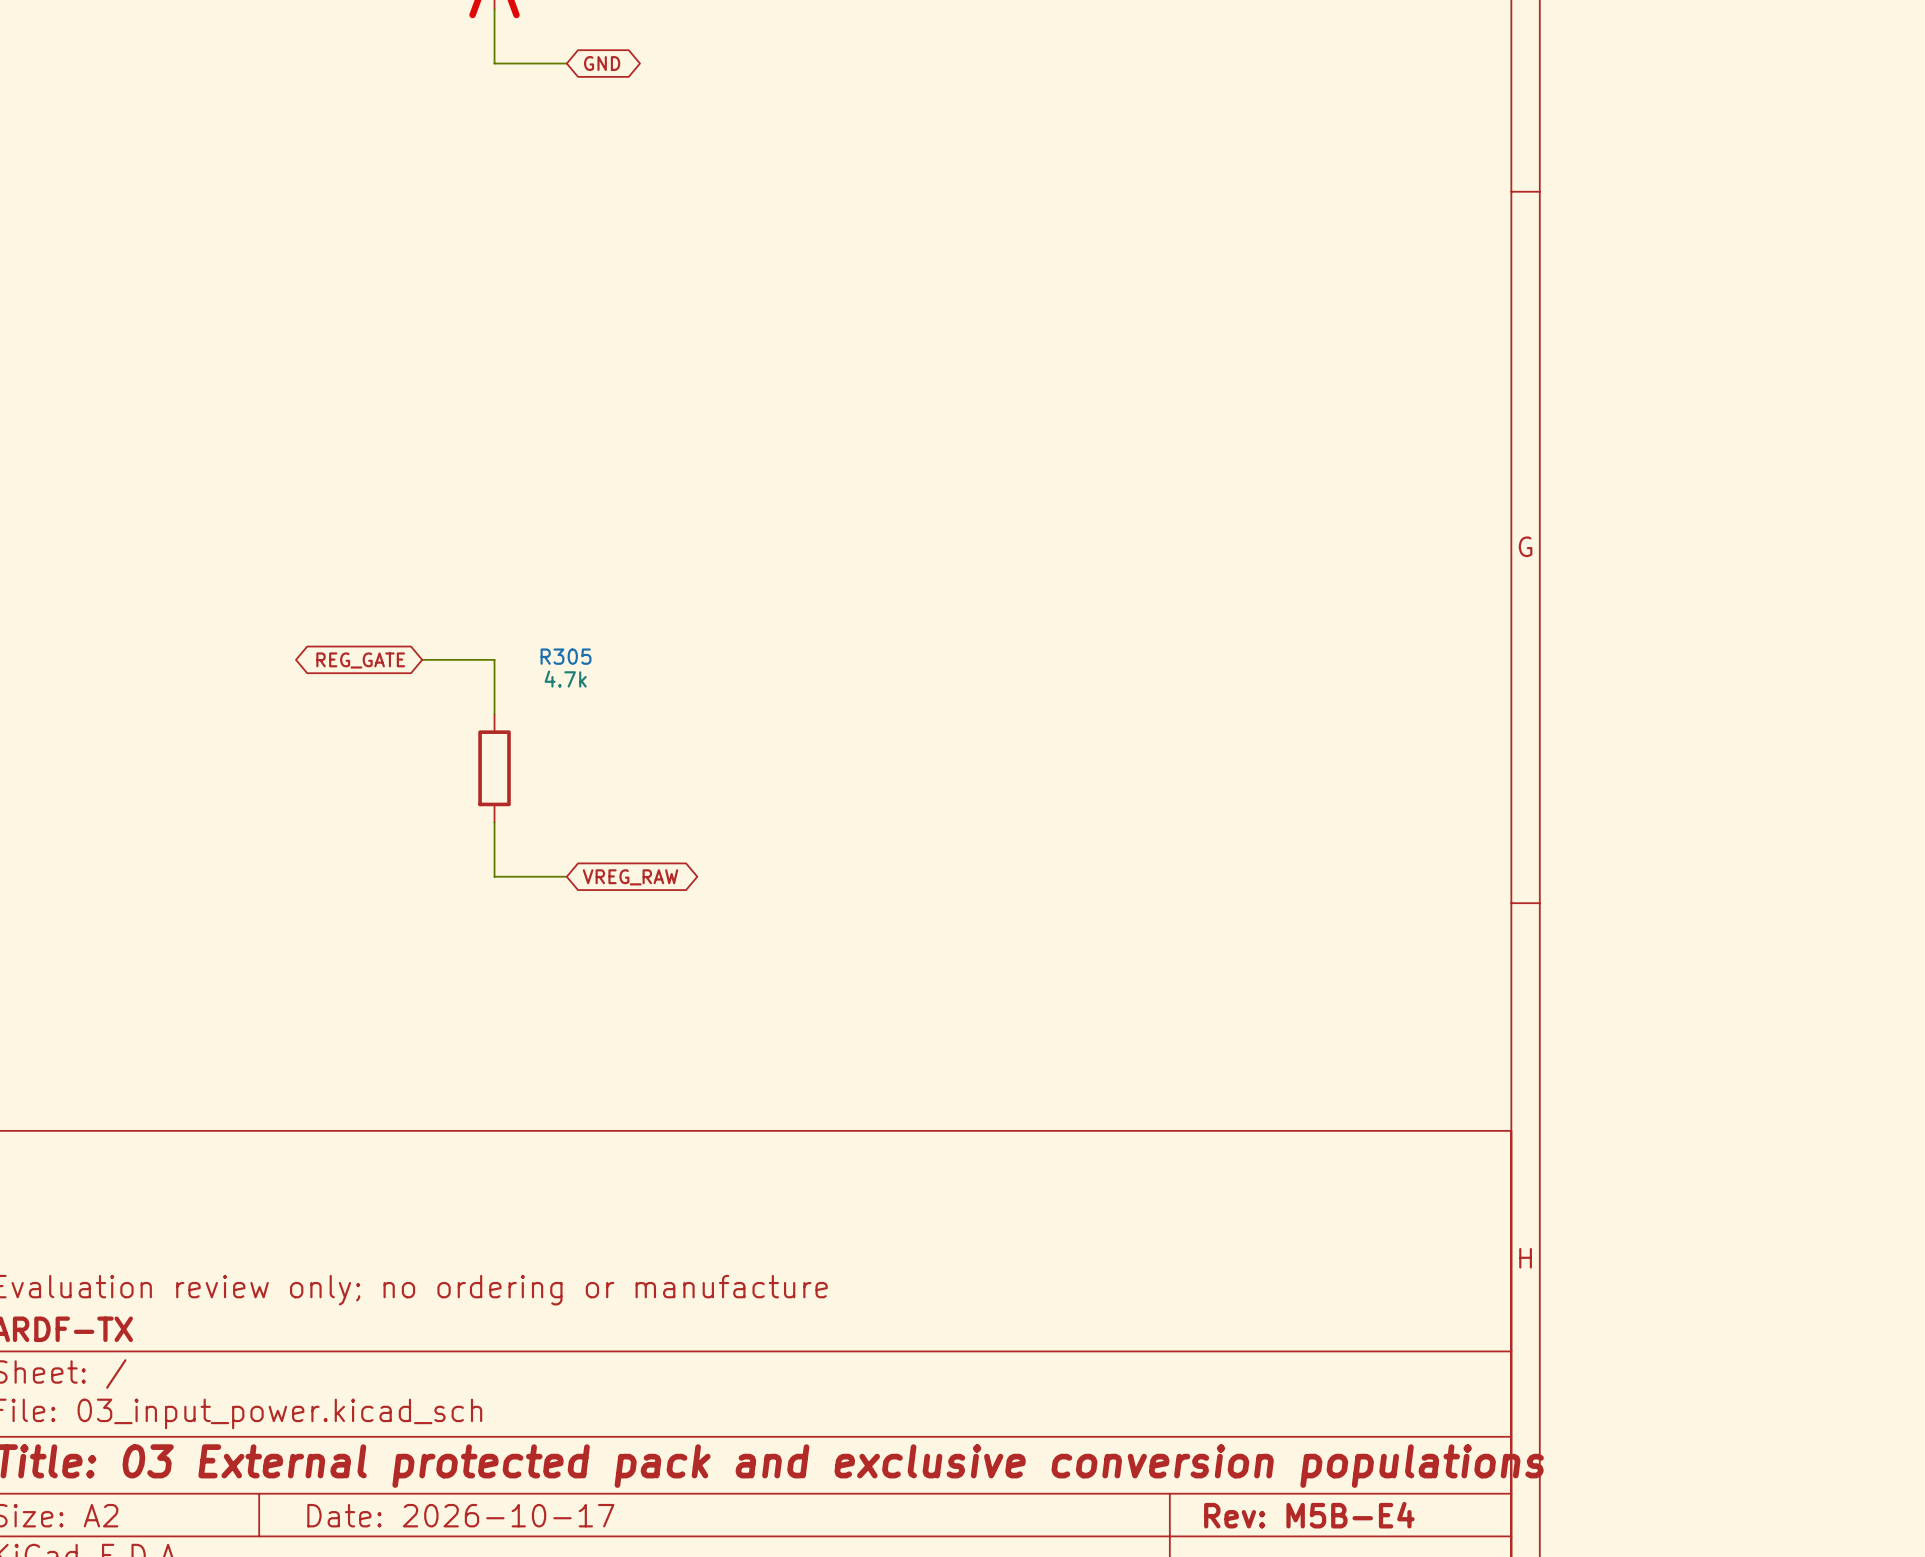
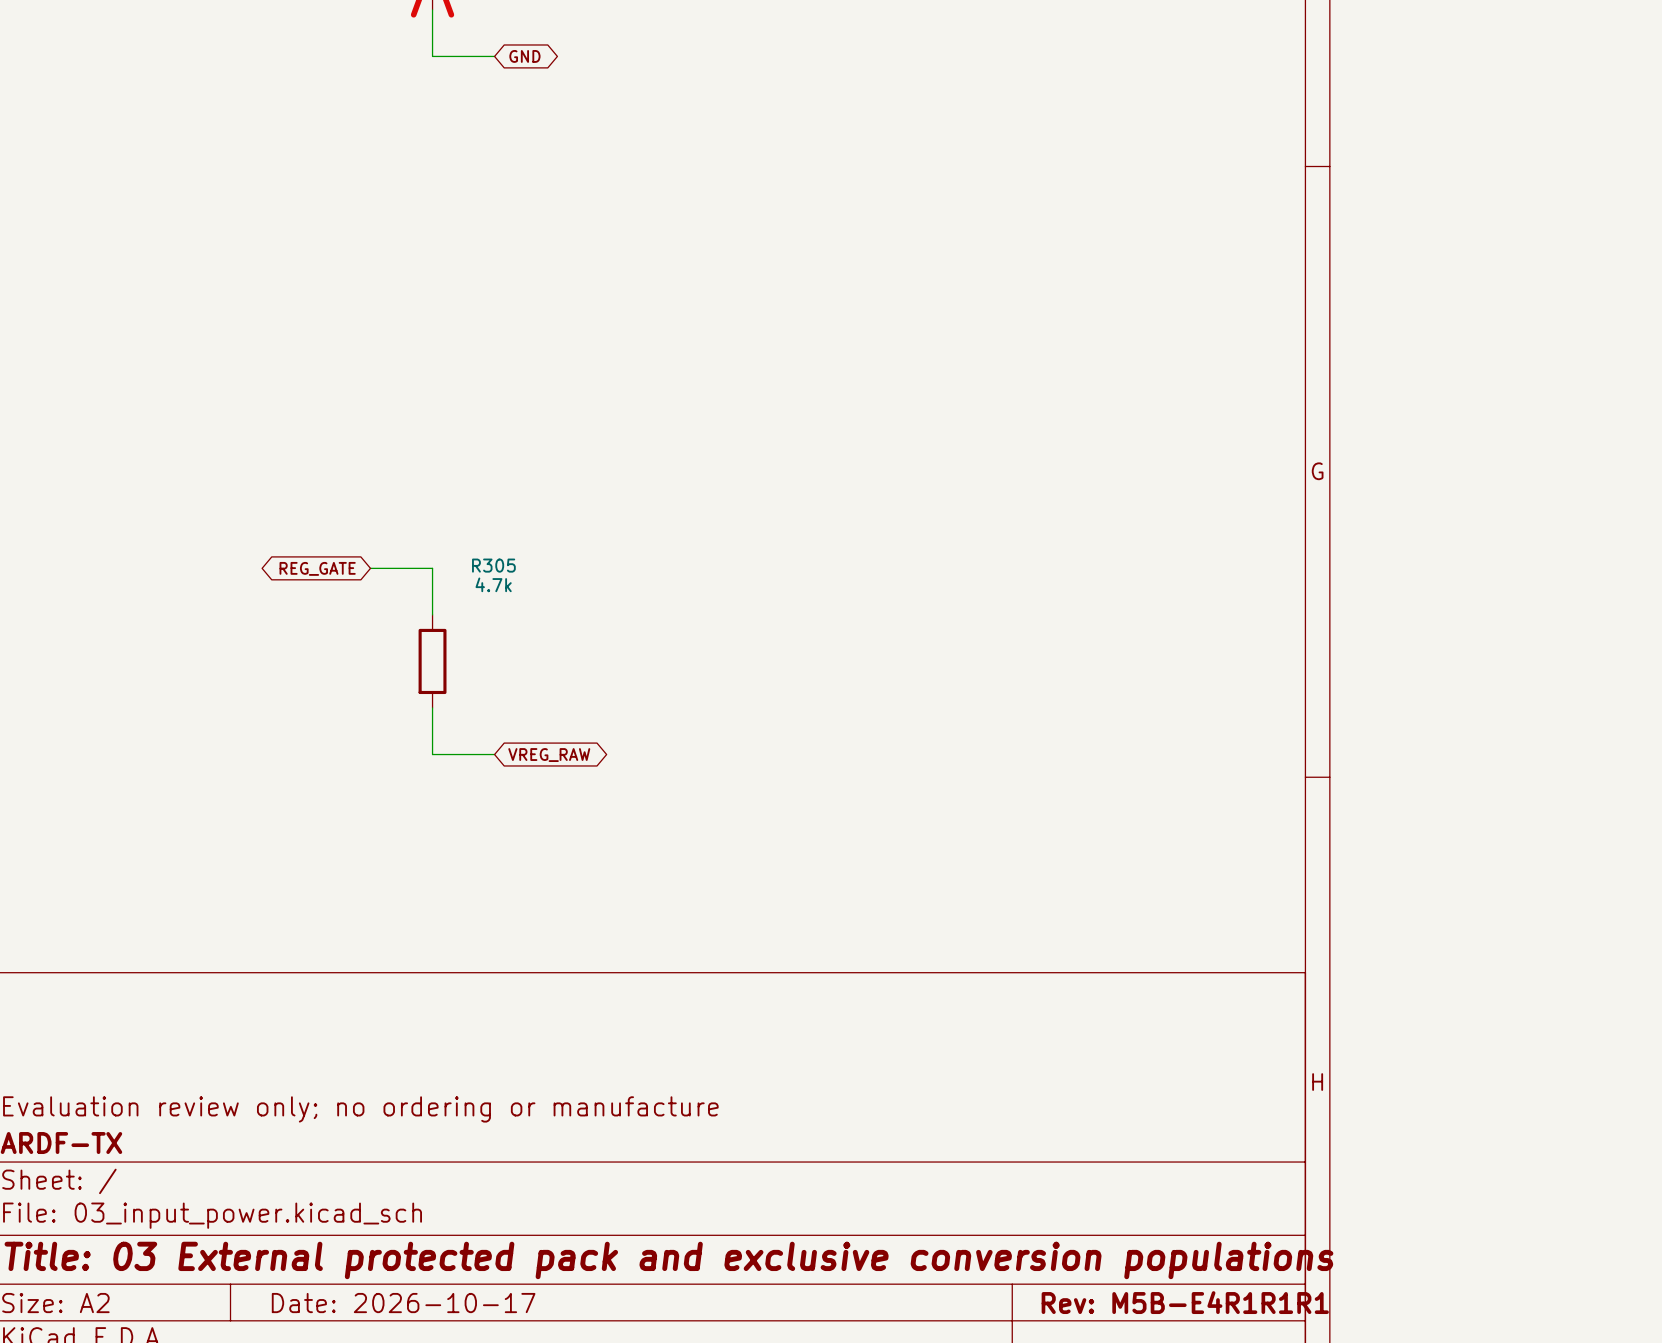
title block: Rev: M5B-E4 (1309, 1515) -> Rev: M5B-E4R1R1R1 (1185, 1302)

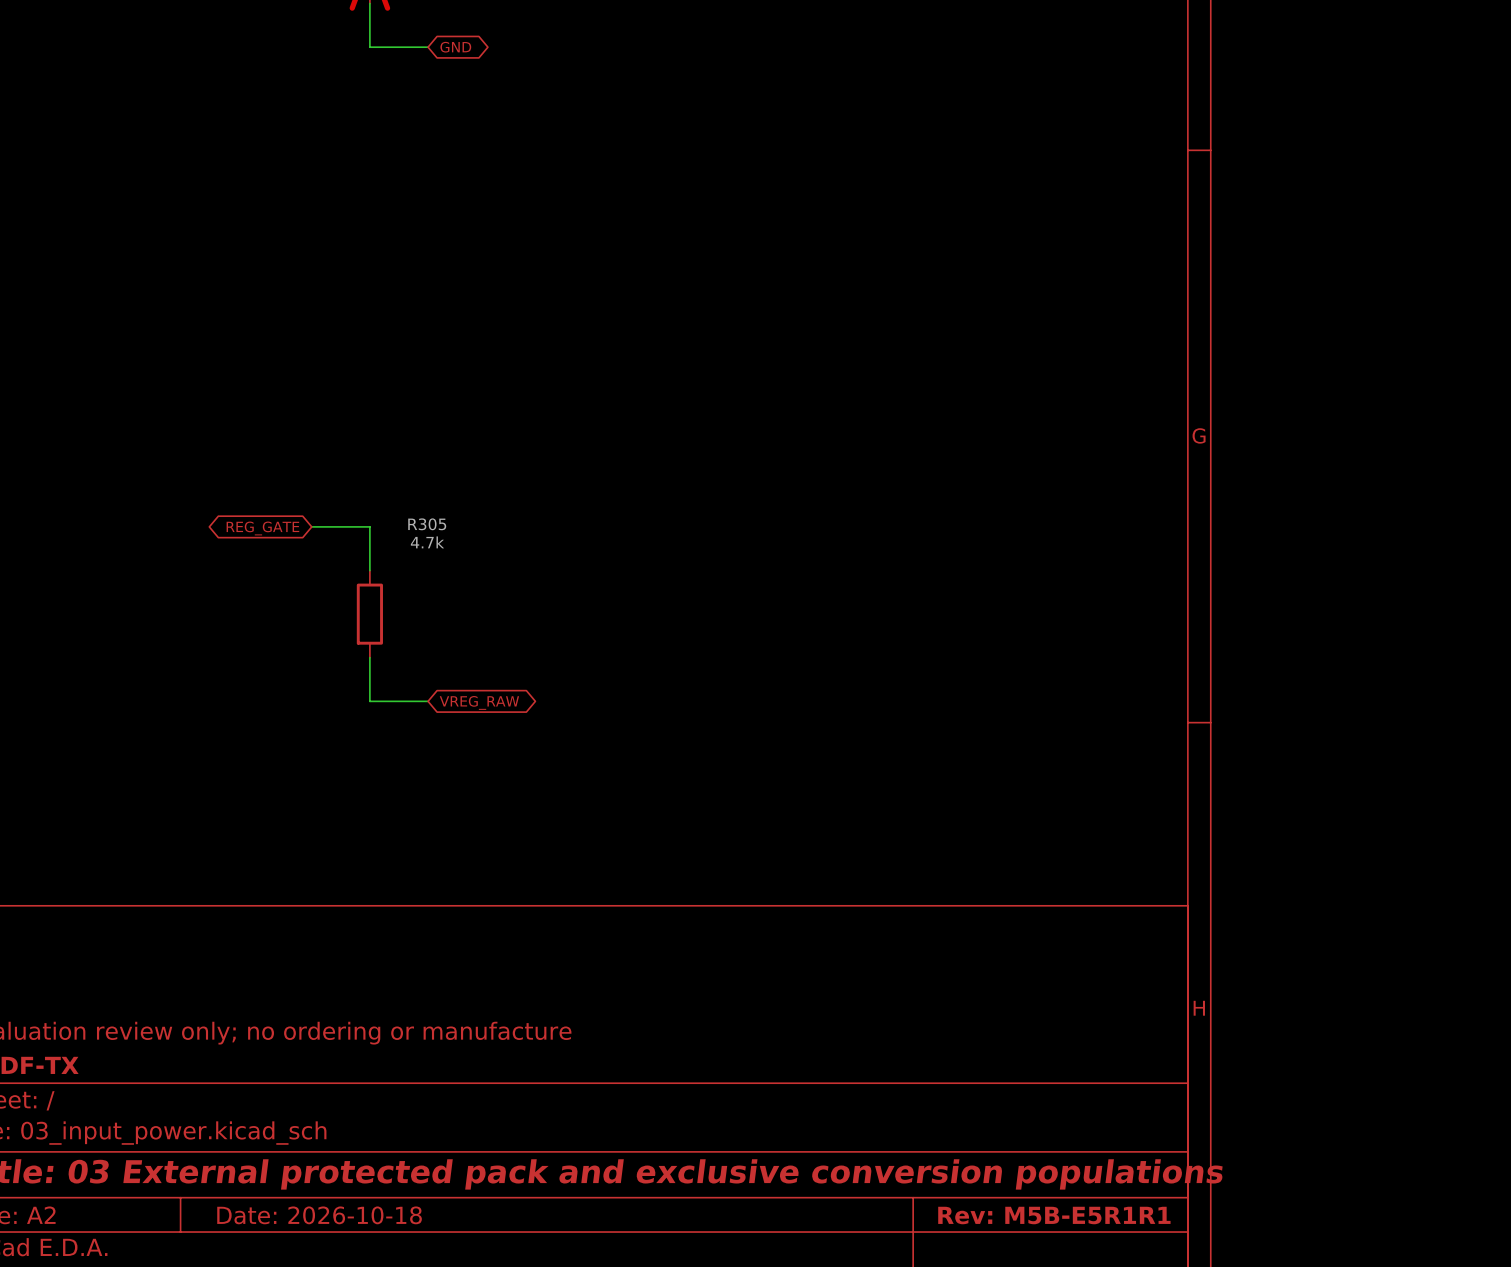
title block: Rev: M5B-E4R1R1R1 (1185, 1302) -> Rev: M5B-E5R1R1 (1054, 1215)
title block: Date: 2026-10-17 (403, 1303) -> Date: 2026-10-18 (319, 1215)

